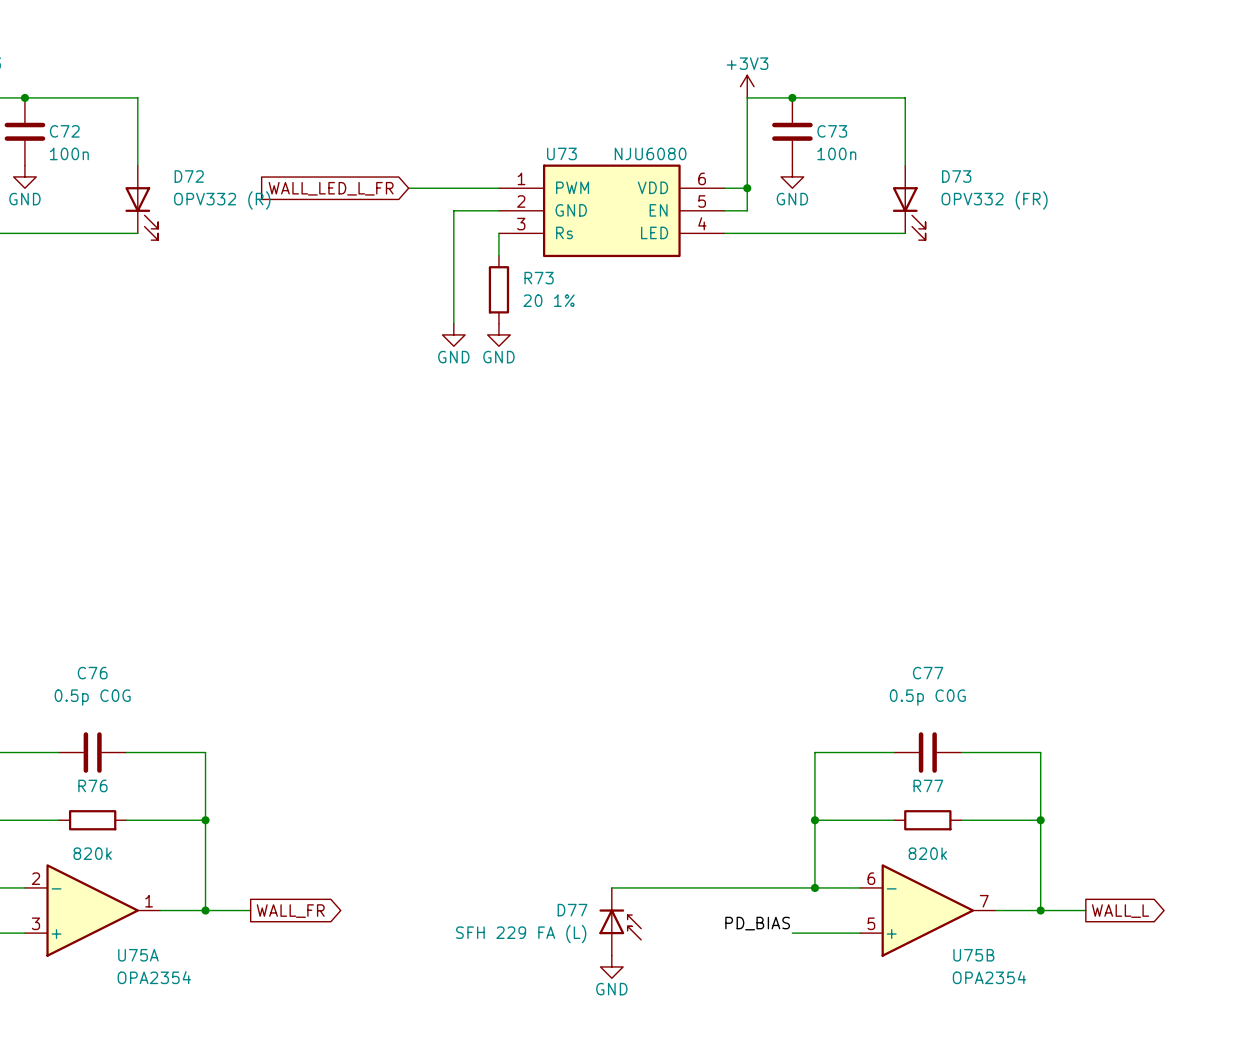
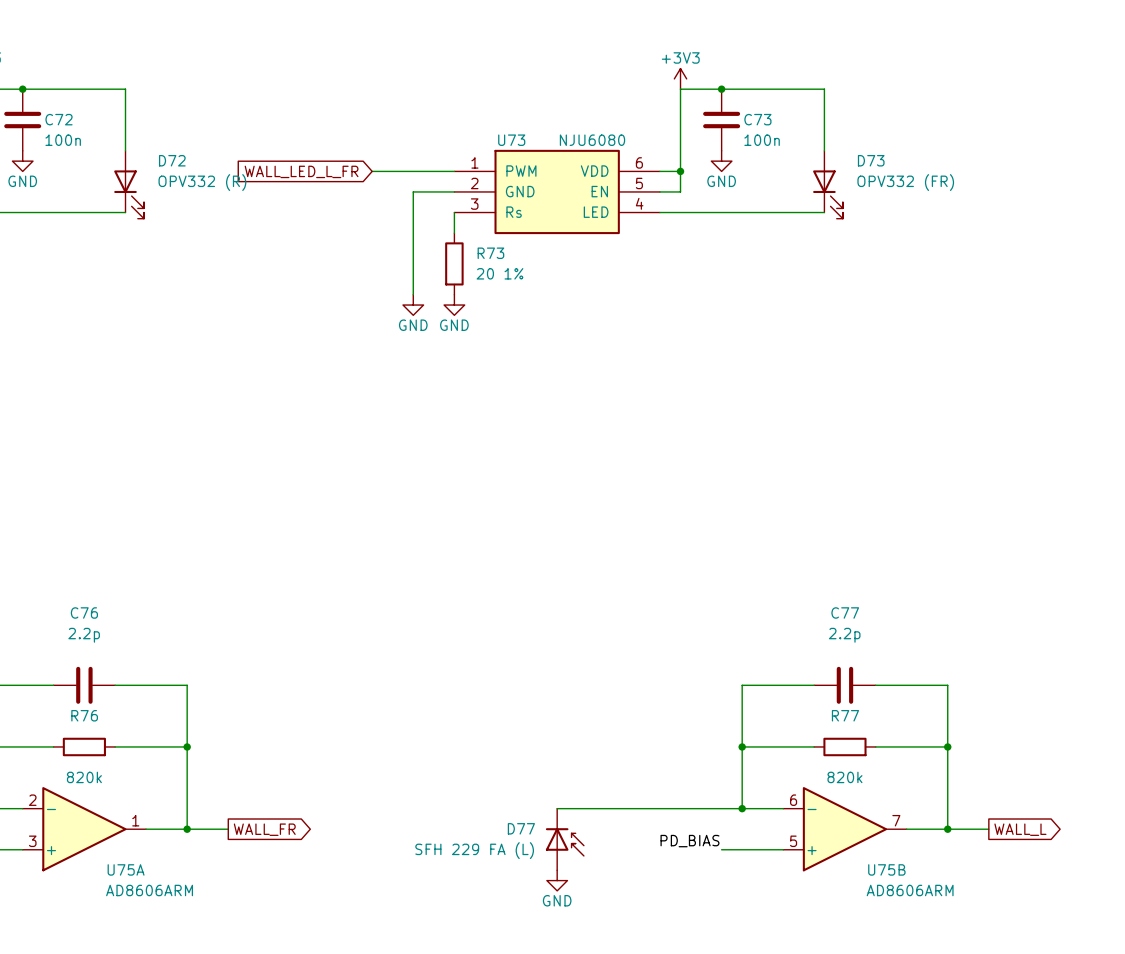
C76 value: 0.5p C0G (92, 697) -> 2.2p (84, 635)
C77 value: 0.5p C0G (927, 697) -> 2.2p (844, 635)
U75A value: OPA2354 (154, 977) -> AD8606ARM (149, 890)
U75B value: OPA2354 (989, 977) -> AD8606ARM (910, 890)

